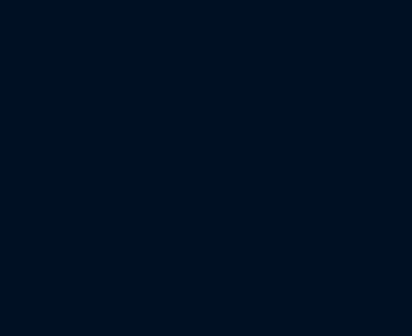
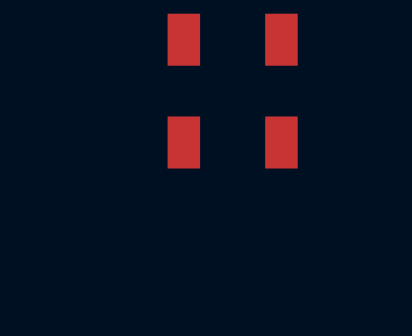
part: none -> (232, 39)
part: none -> (232, 142)

